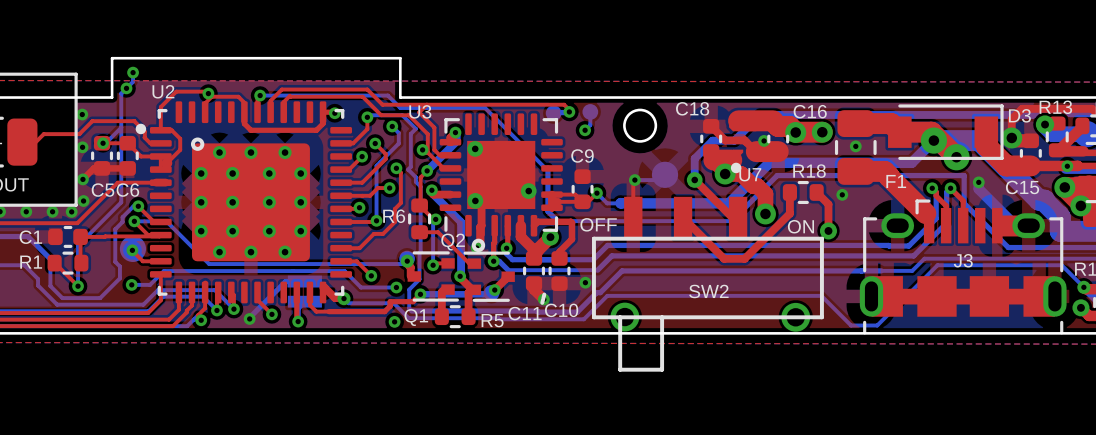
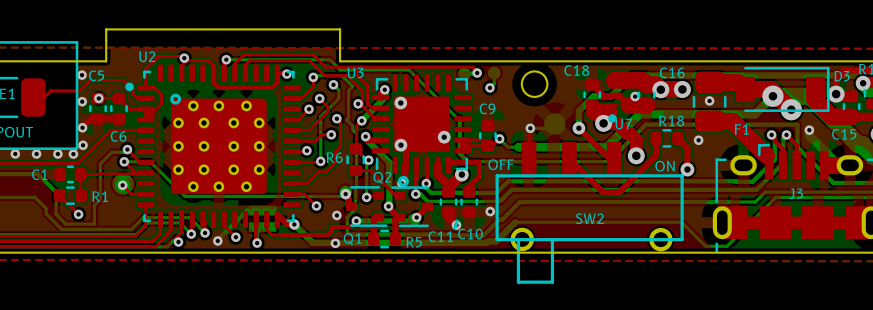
bottom track: (133, 72) (133, 81) (121, 93) (121, 202) (78, 245) (78, 286) -> none
via: (133, 72) -> none
via: (126, 88) -> none
bottom track: (121, 127) (105, 143) (103, 143) -> none
C5 name position: C5 (103, 190) -> C5 (96, 75)
bottom track: (138, 206) (133, 206) (122, 217) (122, 221) (115, 229) (115, 261) (119, 266) (119, 278) (100, 298) (97, 298) -> (127, 149) (124, 152) (112, 152) (100, 163) (100, 199) (94, 205) (94, 224)
R1 name position: R1 (31, 262) -> R1 (100, 196)
bottom track: (131, 284) (150, 284) (163, 271) (344, 271) (361, 287) (396, 287) -> none
via: (131, 284) -> none
bottom track: (616, 295) (607, 295) (583, 319) (408, 318) (393, 303) (348, 303) -> (515, 222) (496, 241) (486, 242) (312, 242) (298, 228)

